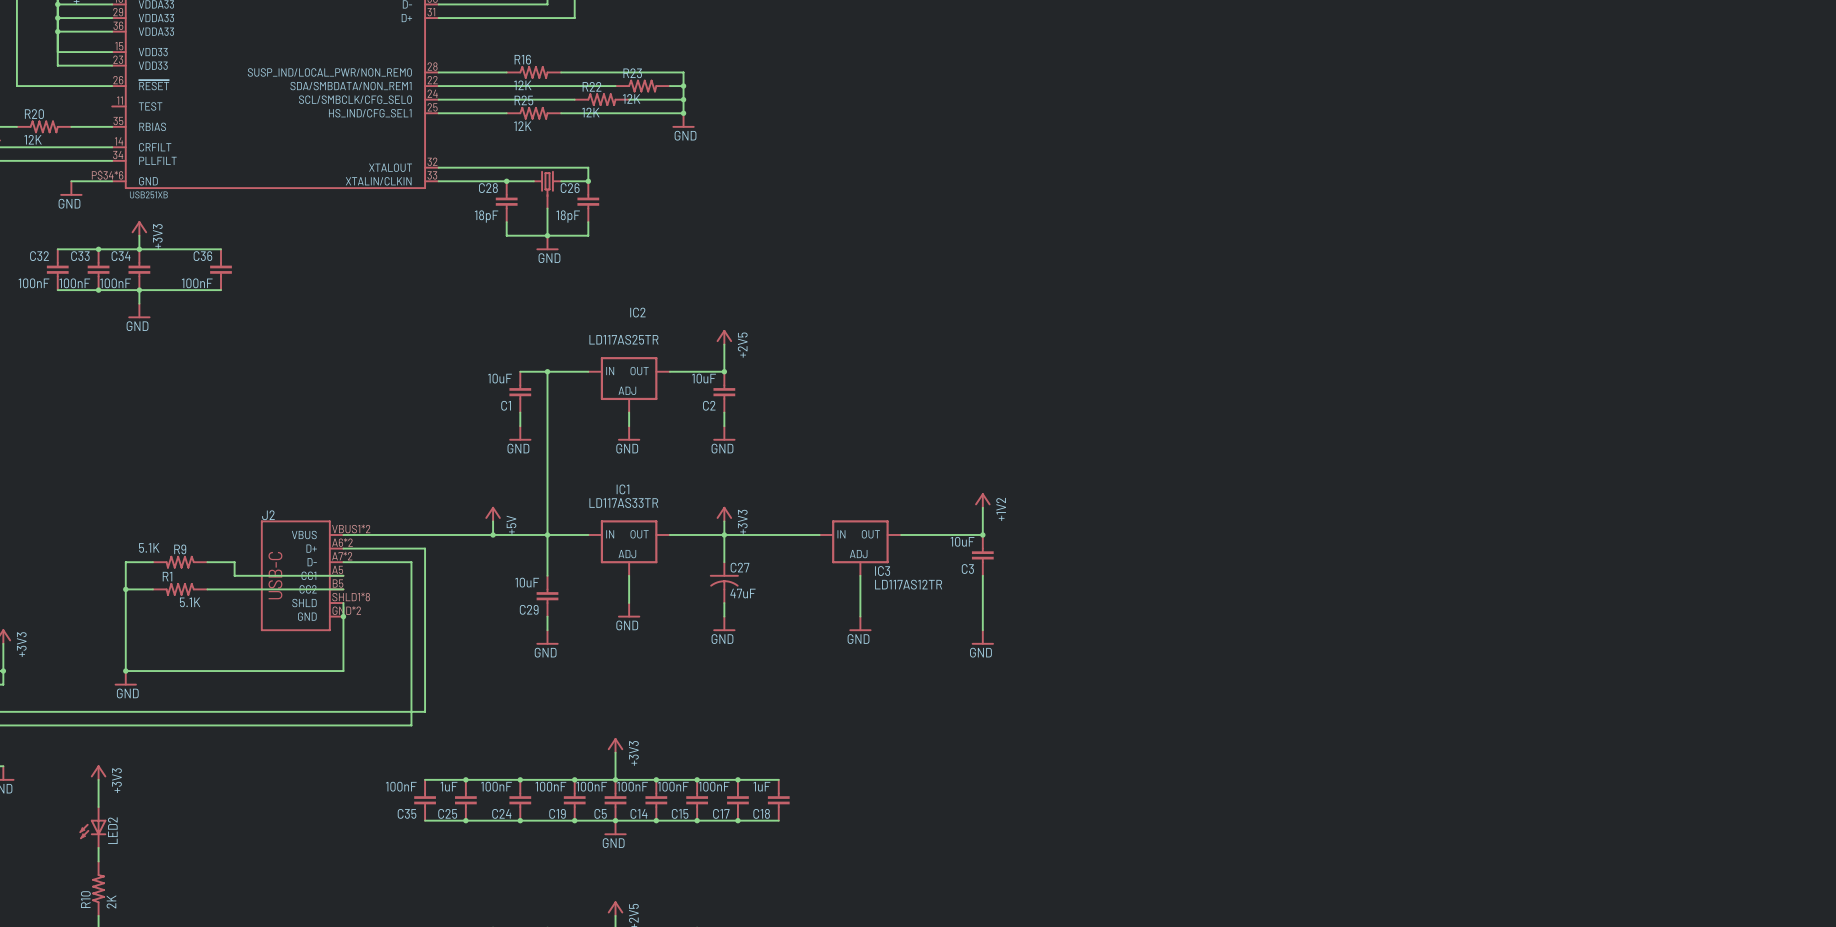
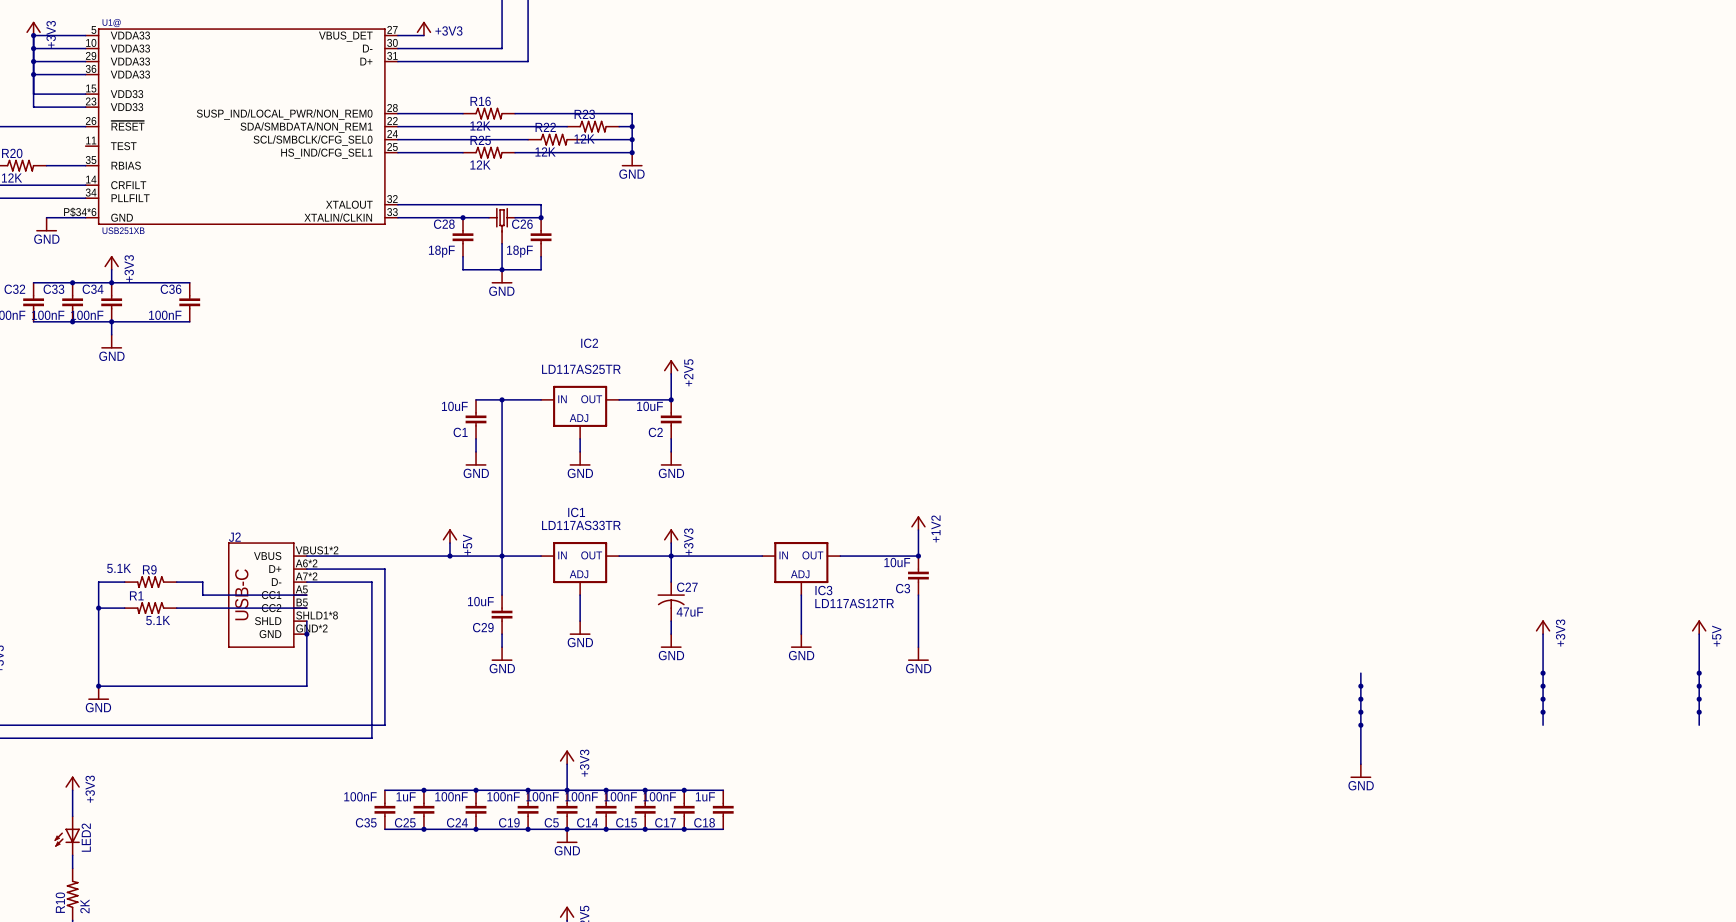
power symbol: none -> +3V3 (1543, 627)
power symbol: none -> +5V (1699, 627)
wire: none -> (1543, 634) (1543, 725)
wire: none -> (1699, 634) (1699, 725)
wire: none -> (1360, 673) (1360, 764)
junction: none -> (1543, 673)
junction: none -> (1699, 673)
junction: none -> (1360, 686)
junction: none -> (1543, 686)
junction: none -> (1699, 686)
junction: none -> (1360, 699)
junction: none -> (1543, 699)
junction: none -> (1699, 699)
junction: none -> (1360, 712)
junction: none -> (1543, 712)
junction: none -> (1699, 712)
junction: none -> (1360, 725)
power symbol: none -> GND (1360, 771)

